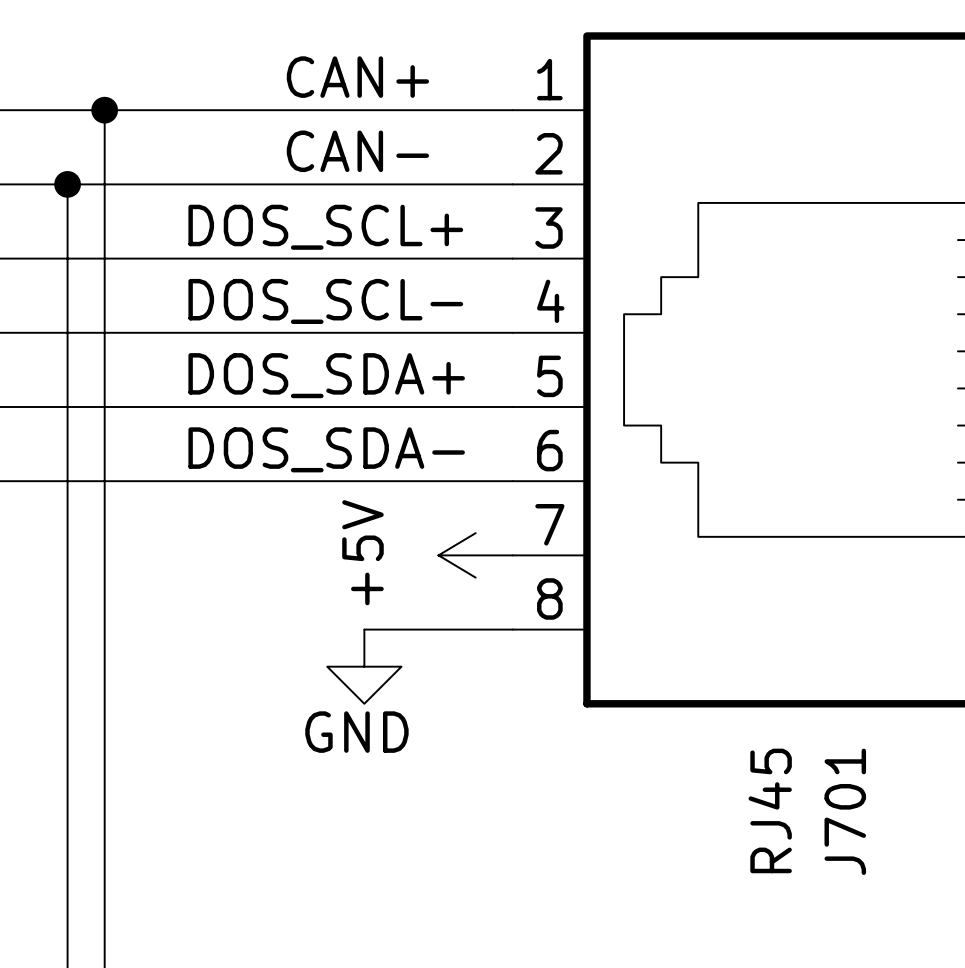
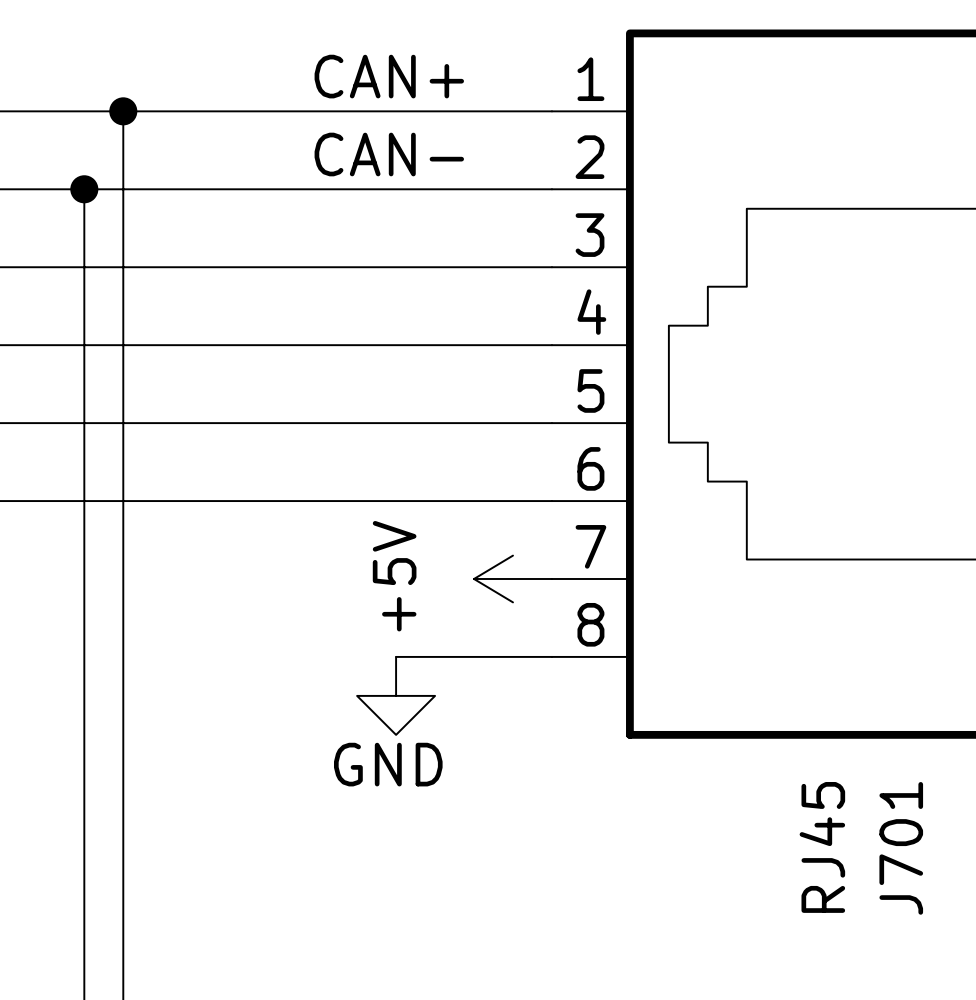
label: DOS_SCL+ (325, 227) -> none
label: DOS_SCL- (325, 301) -> none
label: DOS_SDA+ (326, 375) -> none
label: DOS_SDA- (326, 449) -> none

